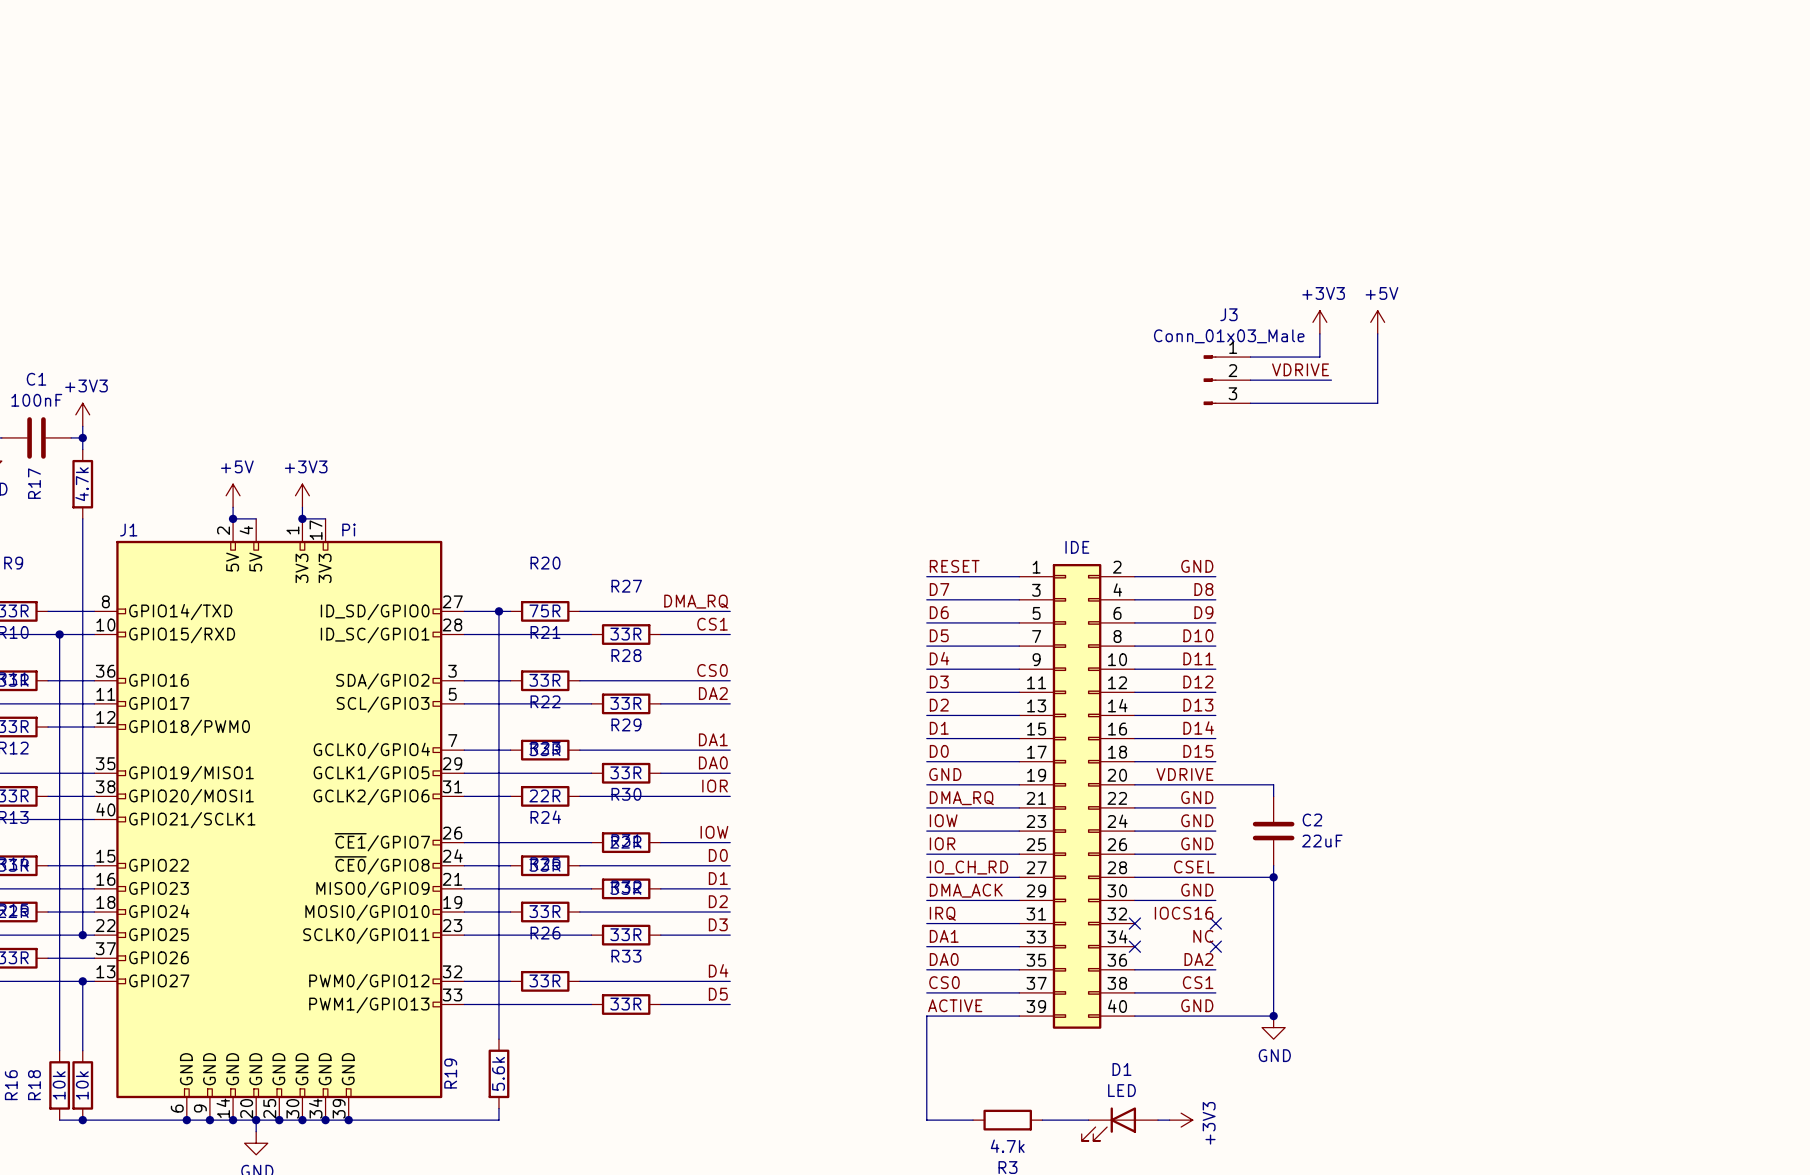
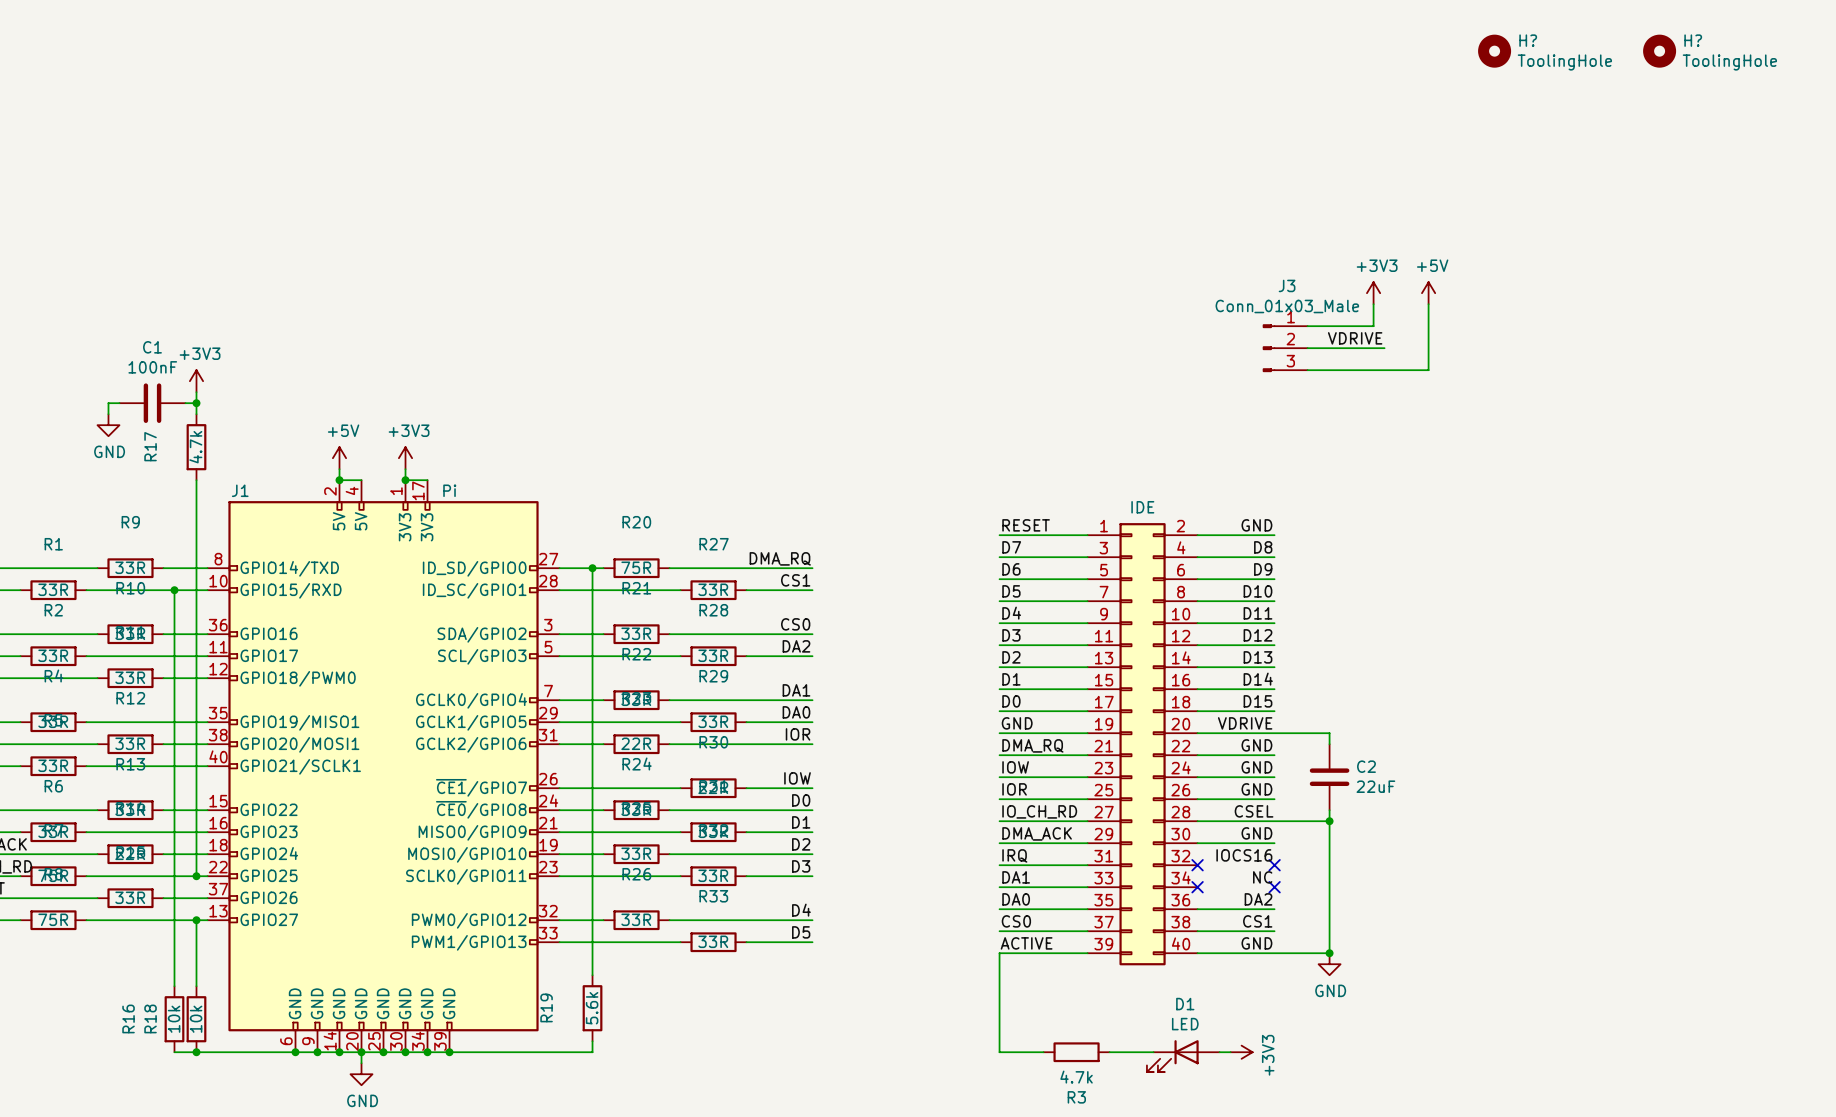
H?: none -> ToolingHole (1494, 51)
H?: none -> ToolingHole (1659, 51)

